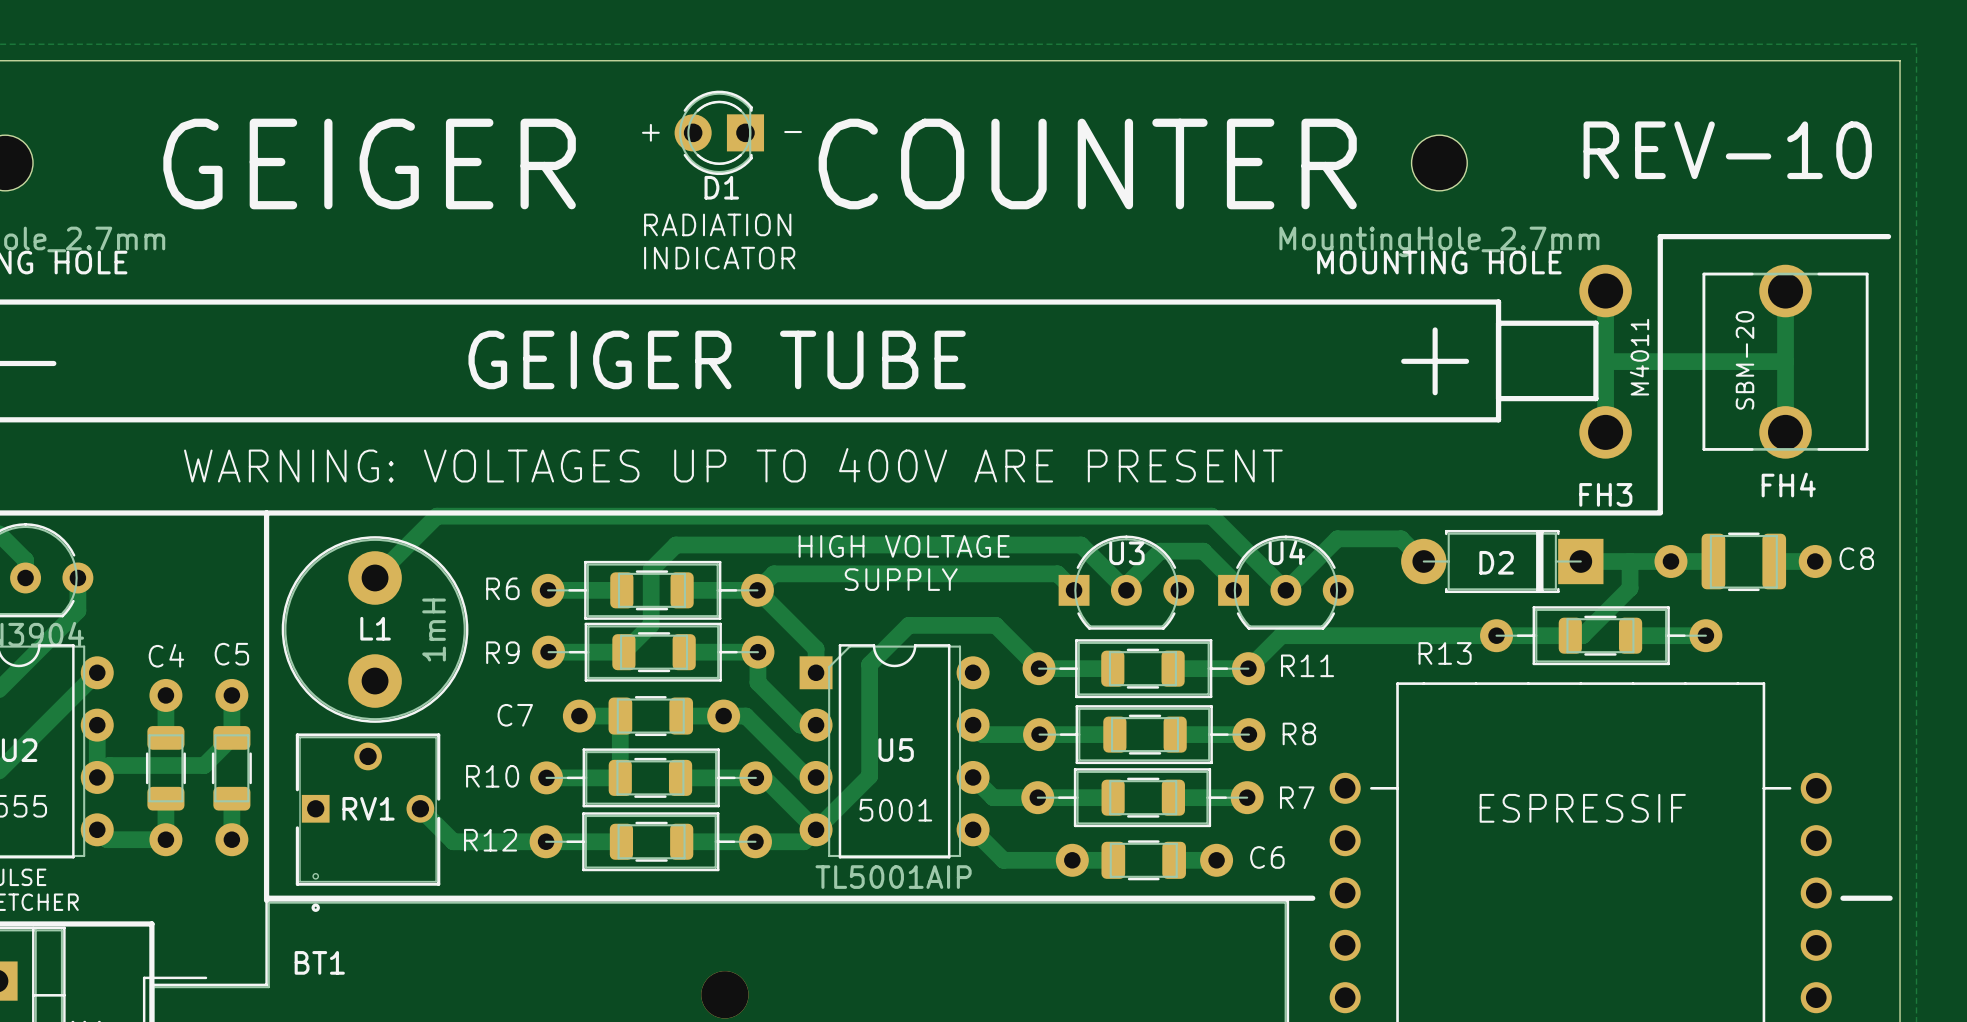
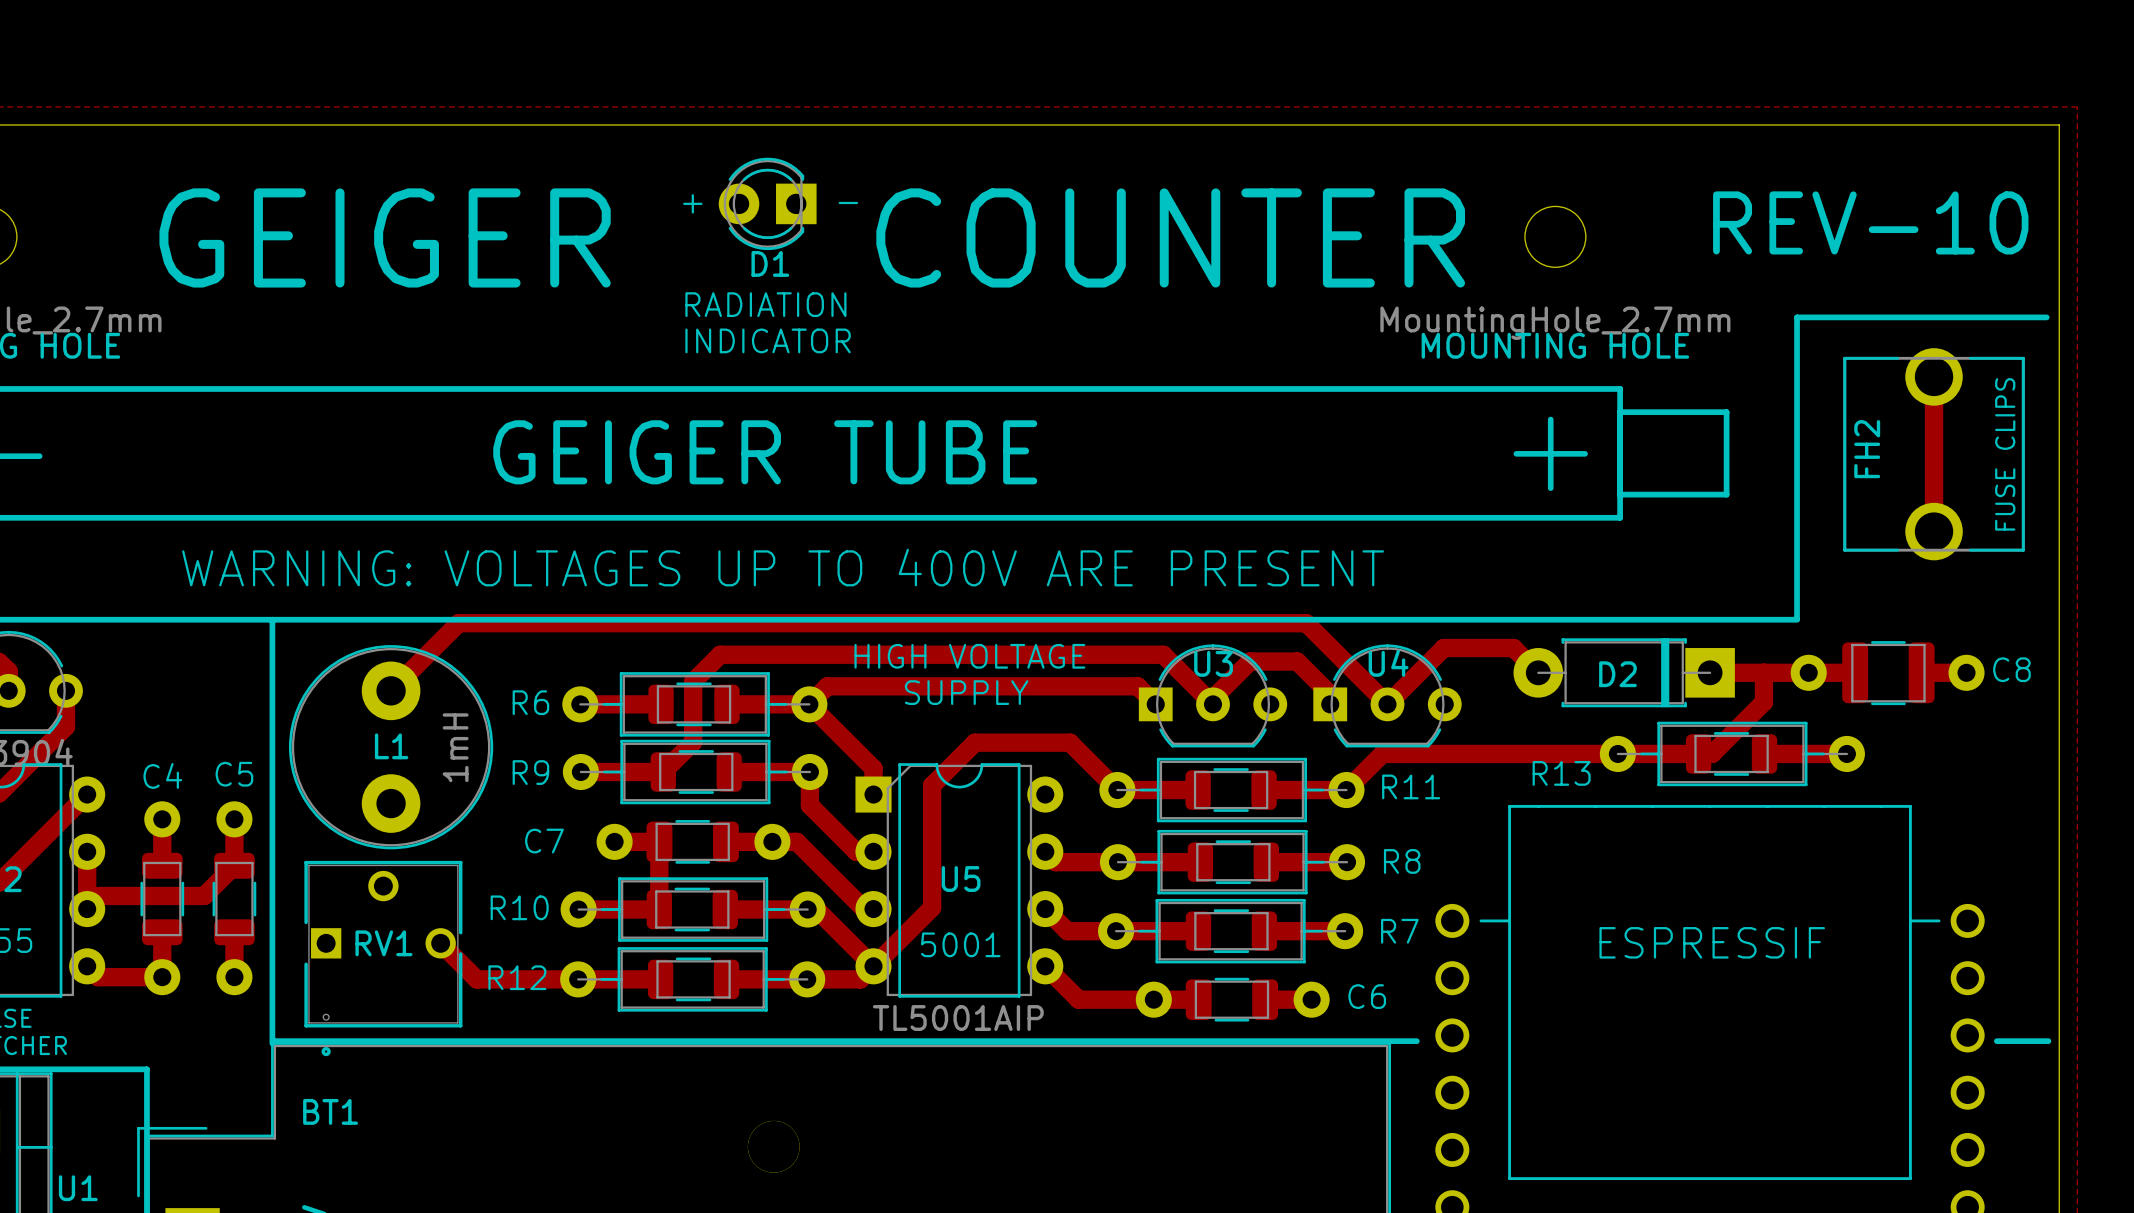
track: (1605, 291) (1605, 432) -> none
text: M4011 (1639, 357) -> none
text: SBM-20 (1744, 360) -> none
track: (1605, 361) (1785, 361) -> none
FH3: (1605, 361) -> none
text: none -> FUSE CLIPS (2005, 454)
FH4 name: FH4 (1788, 485) -> FH2 (1867, 449)

